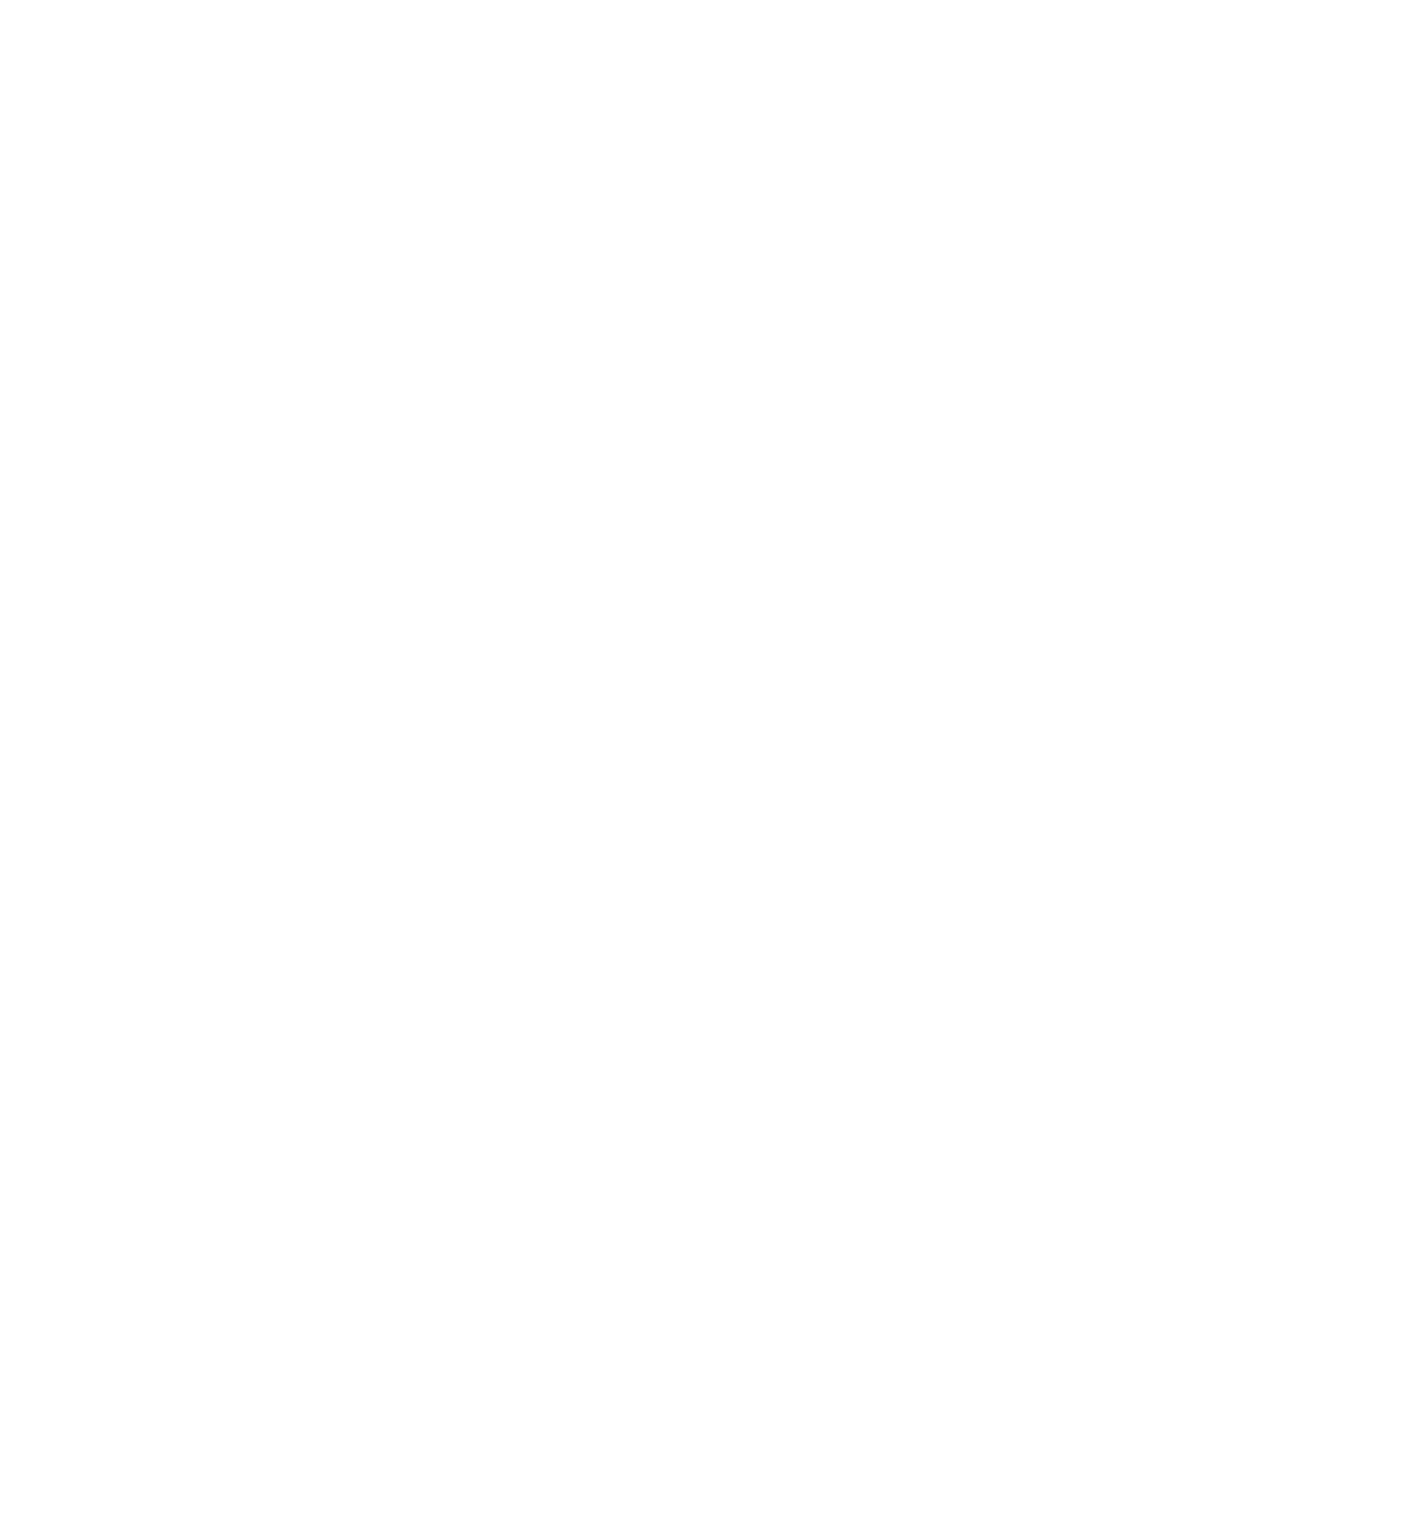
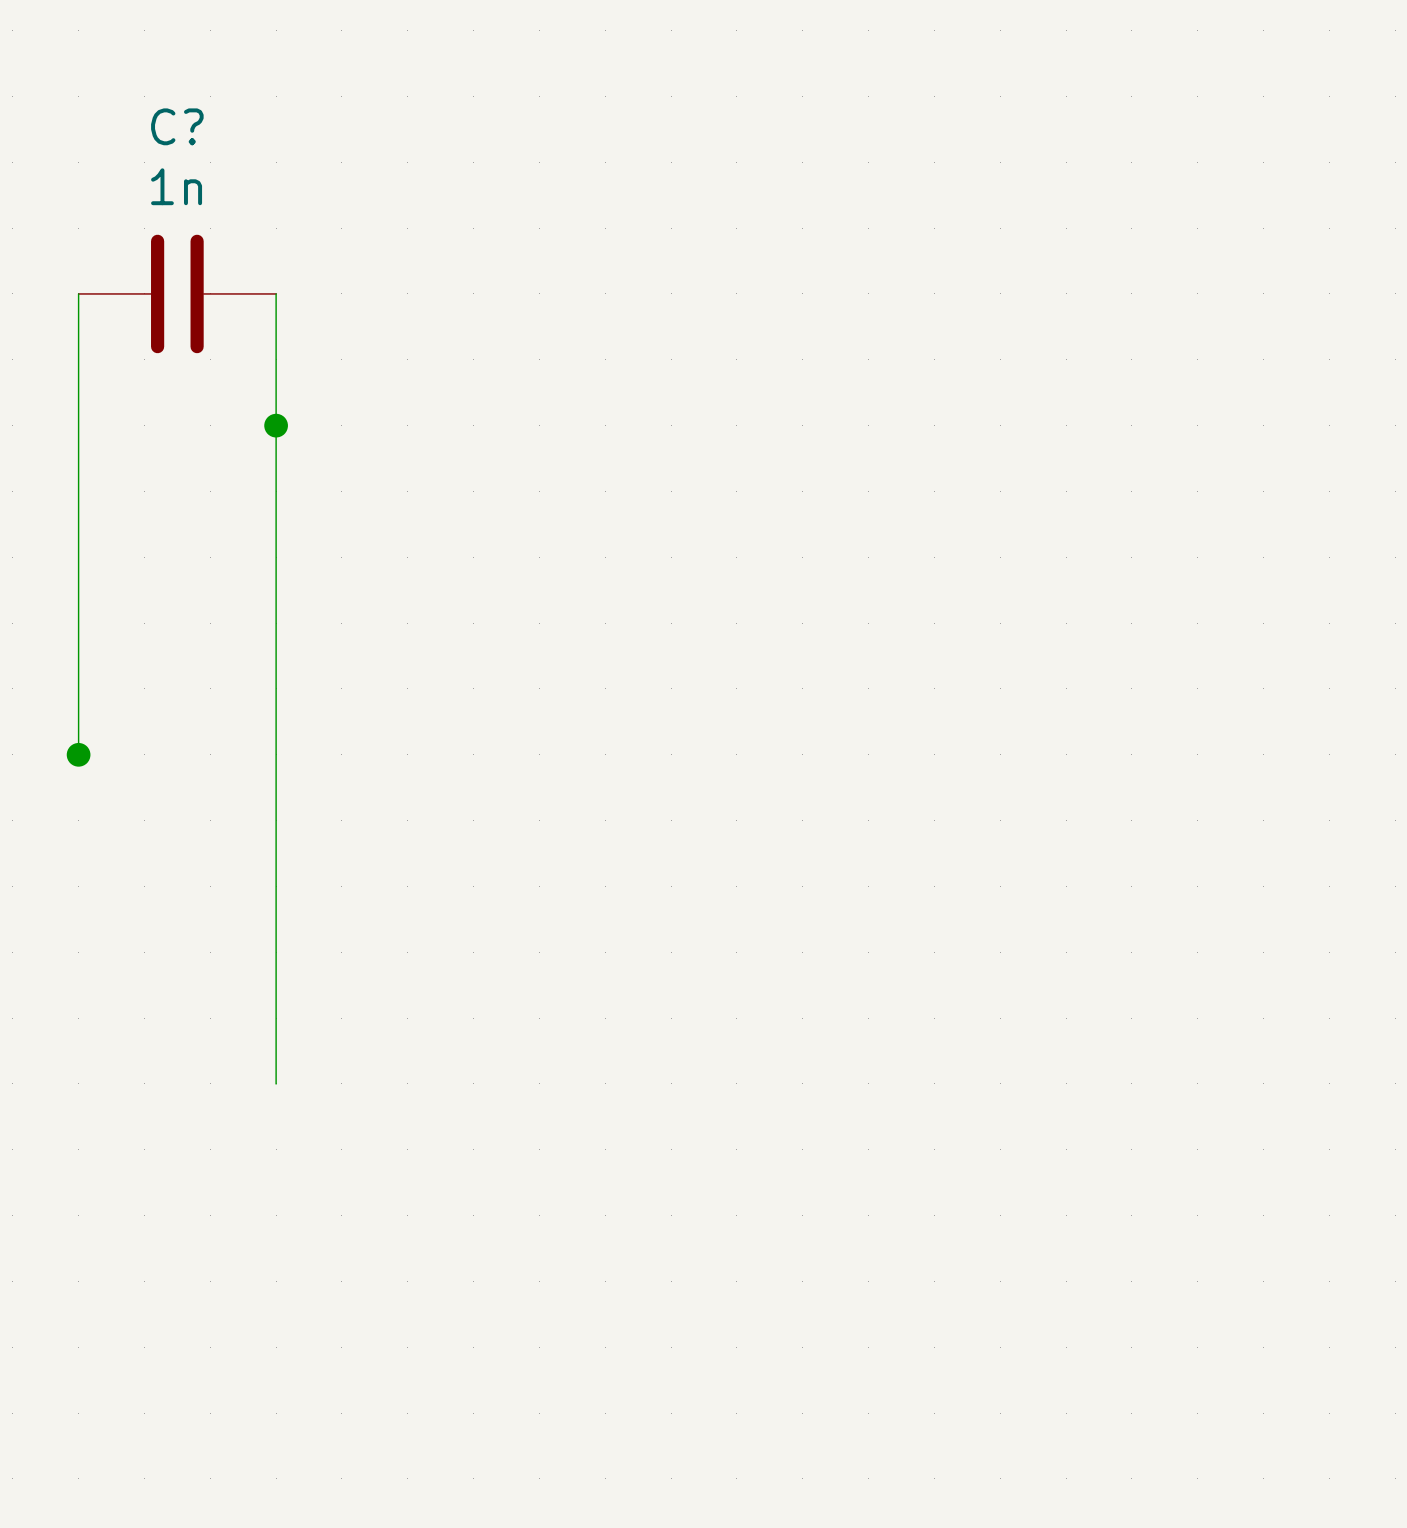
wire: none -> (78, 293) (78, 754)
C?: none -> 1n (177, 293)
wire: none -> (276, 293) (276, 1083)
junction: none -> (276, 425)
junction: none -> (78, 754)

